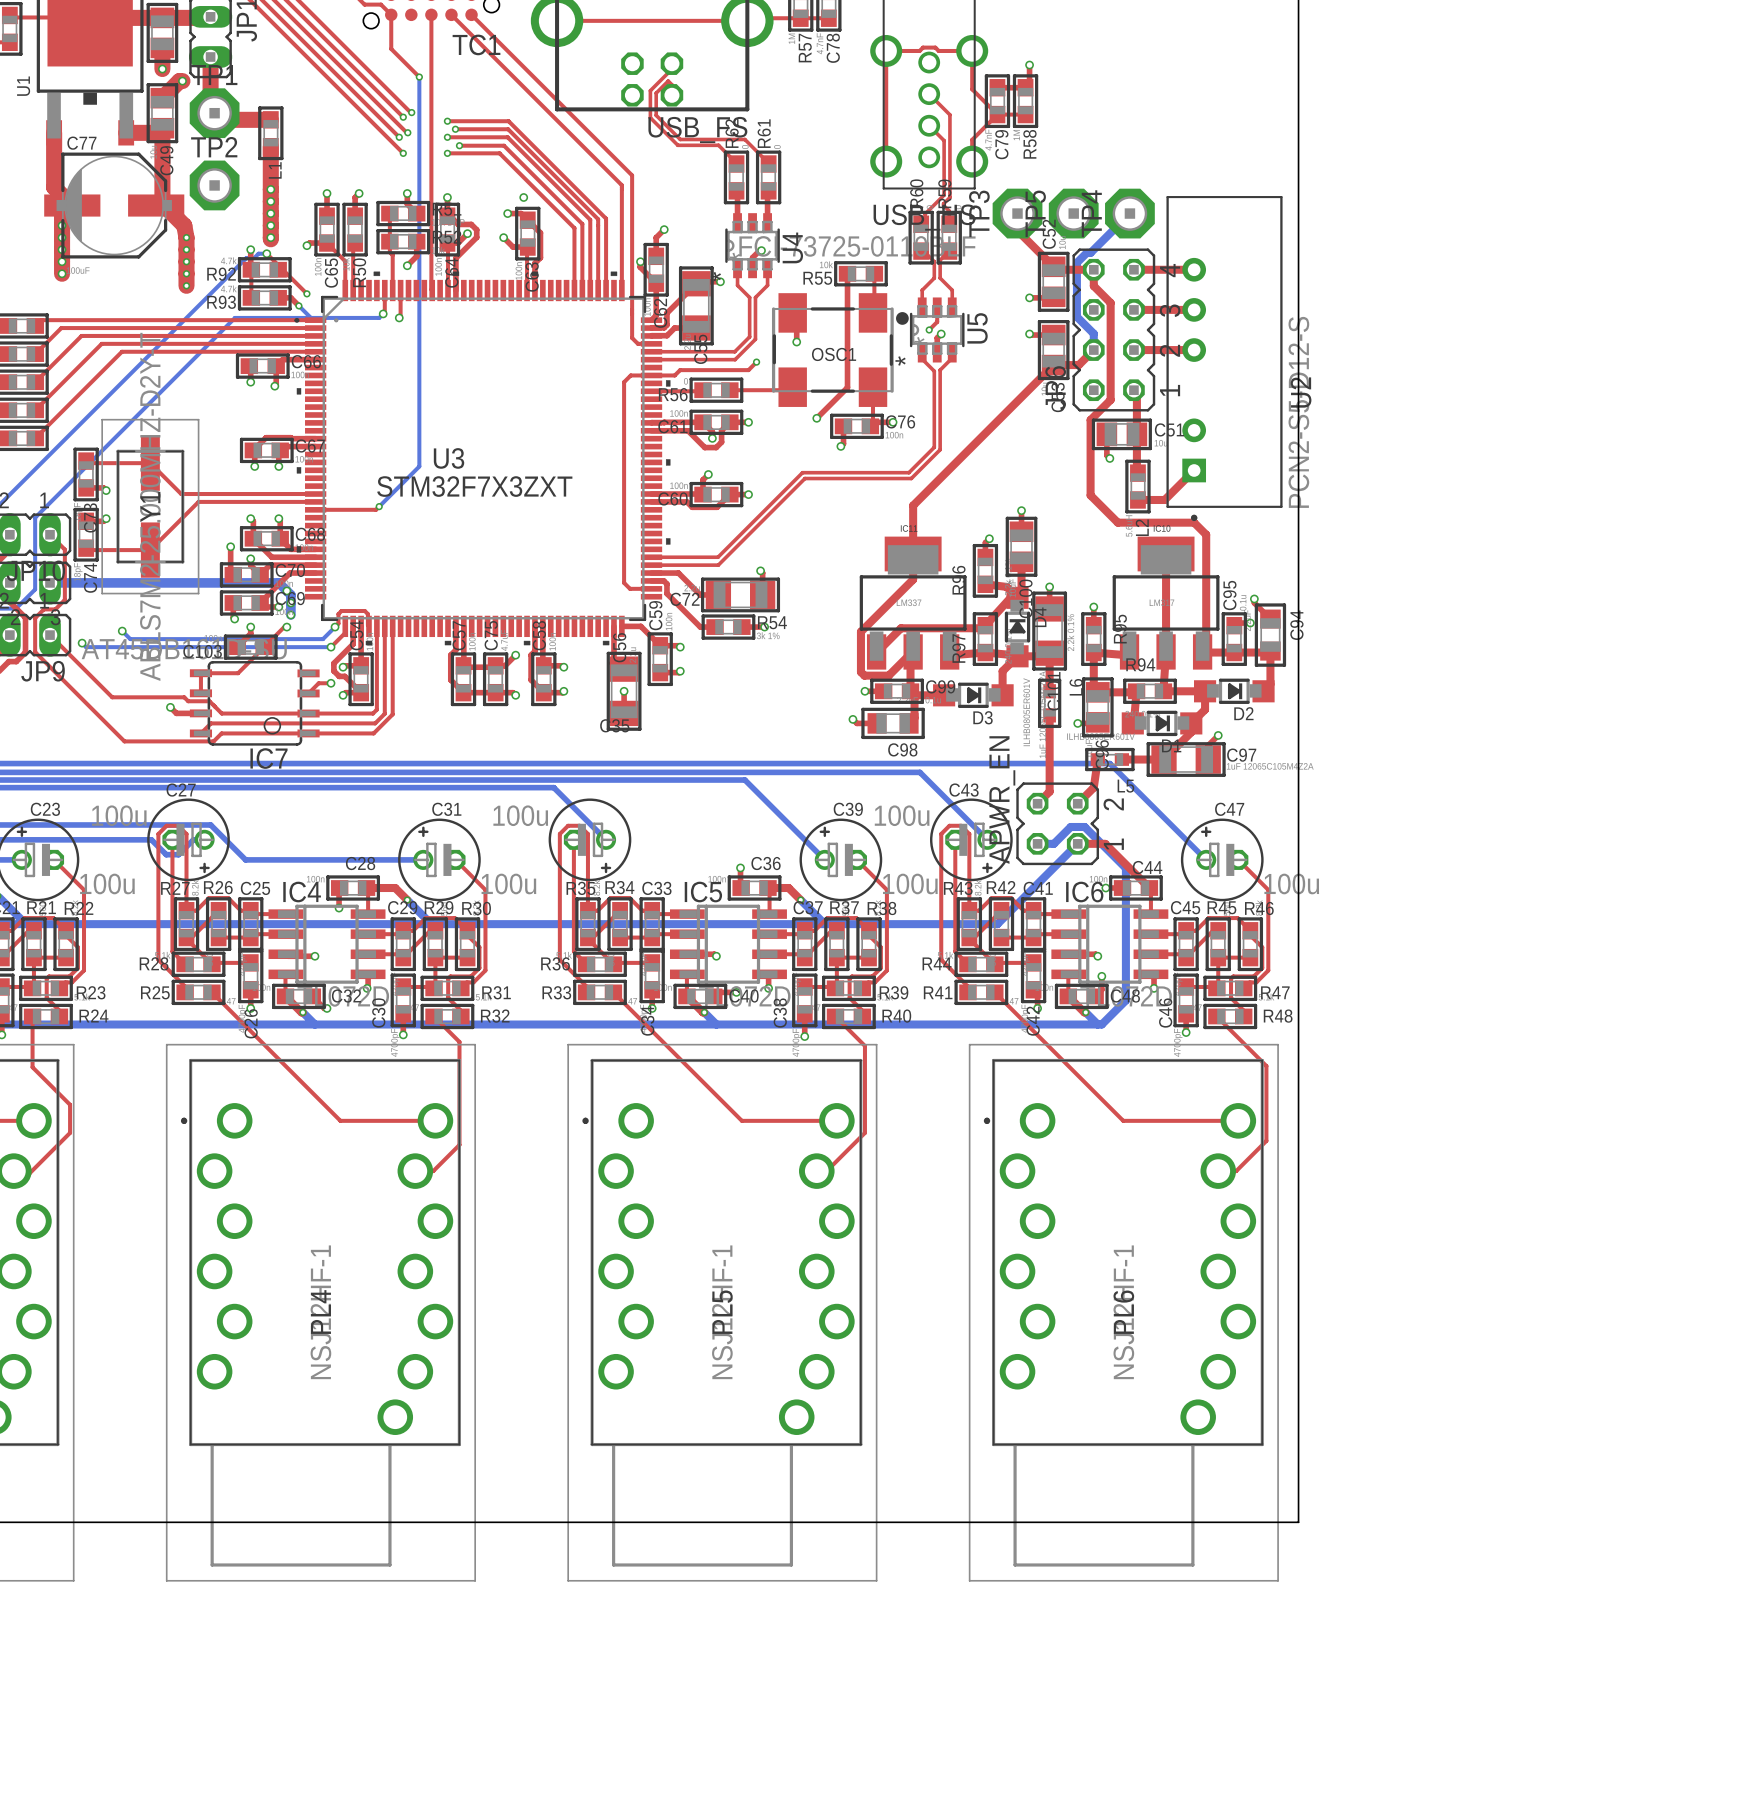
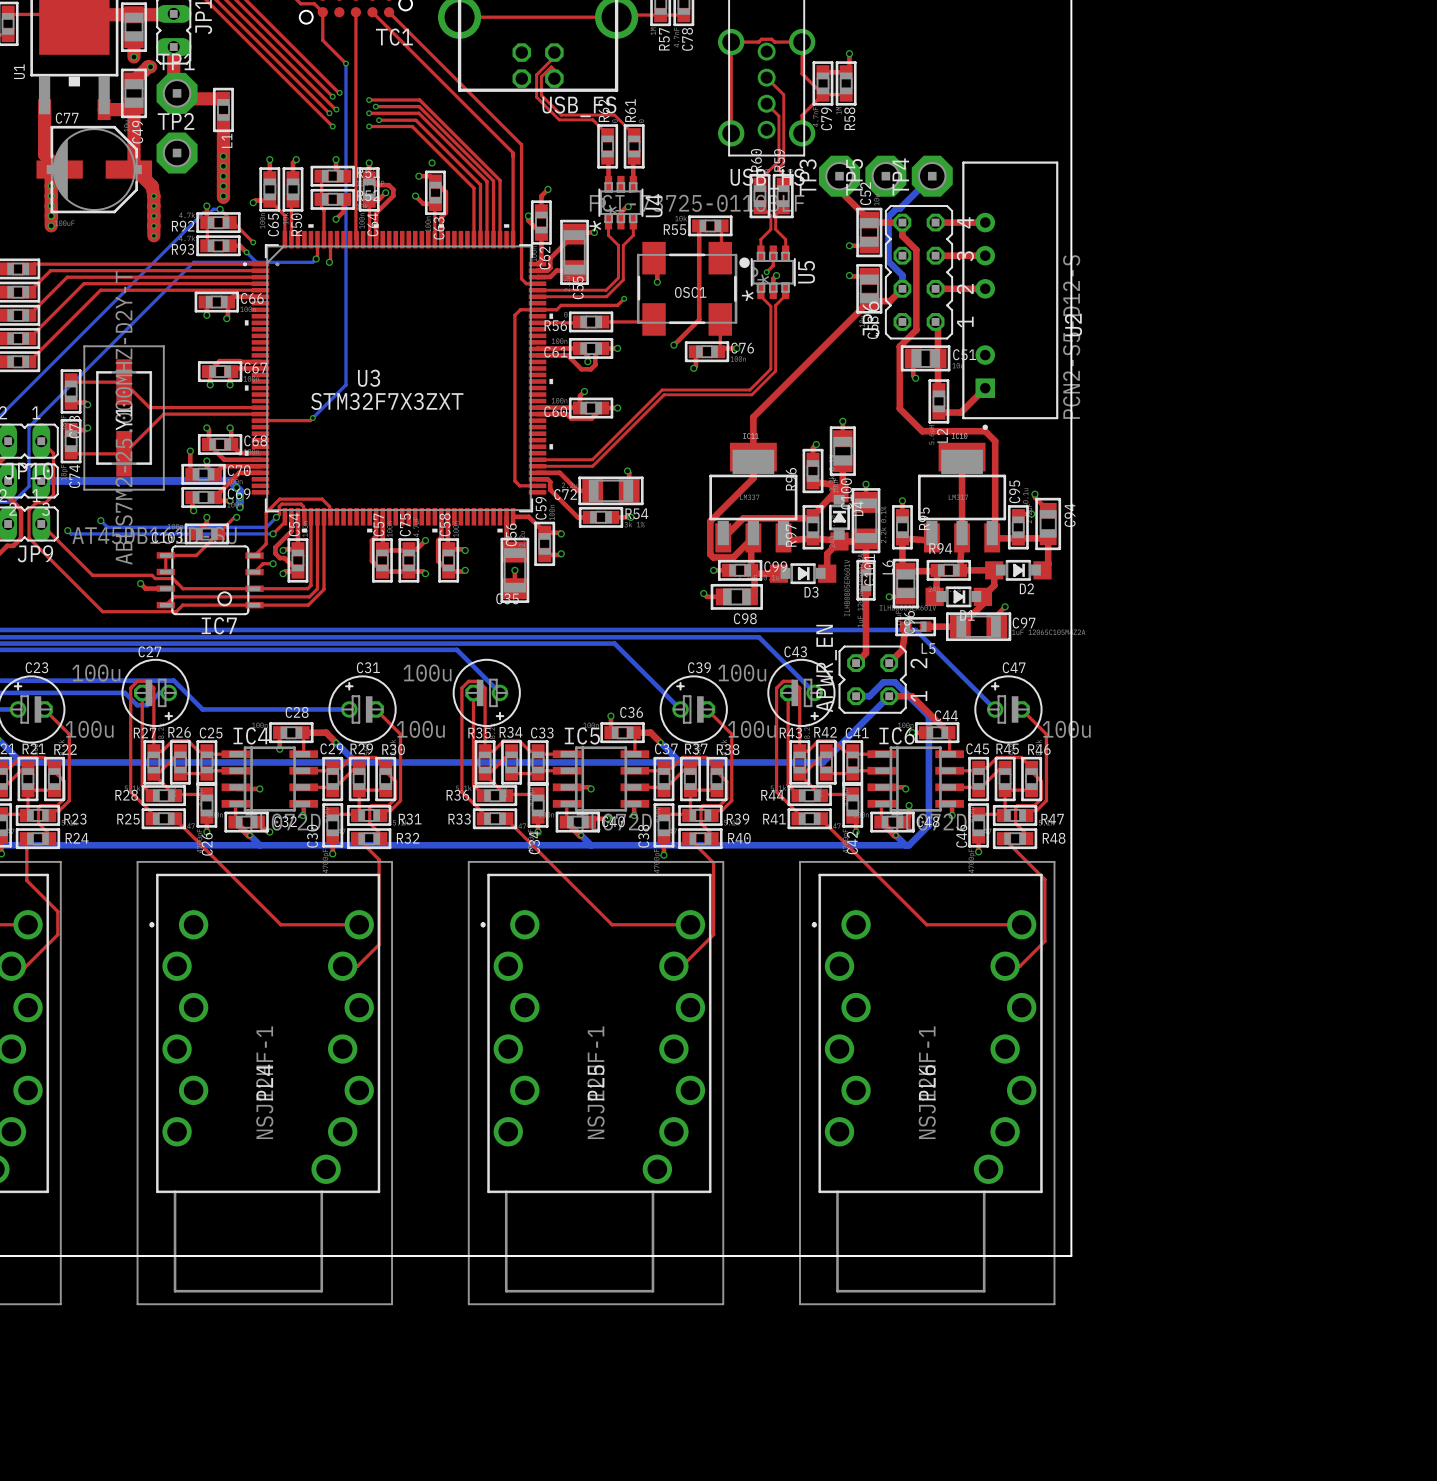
top track: none -> (330, 516) (329, 506) (322, 499) (279, 499) (266, 512) (266, 543) (254, 555)

